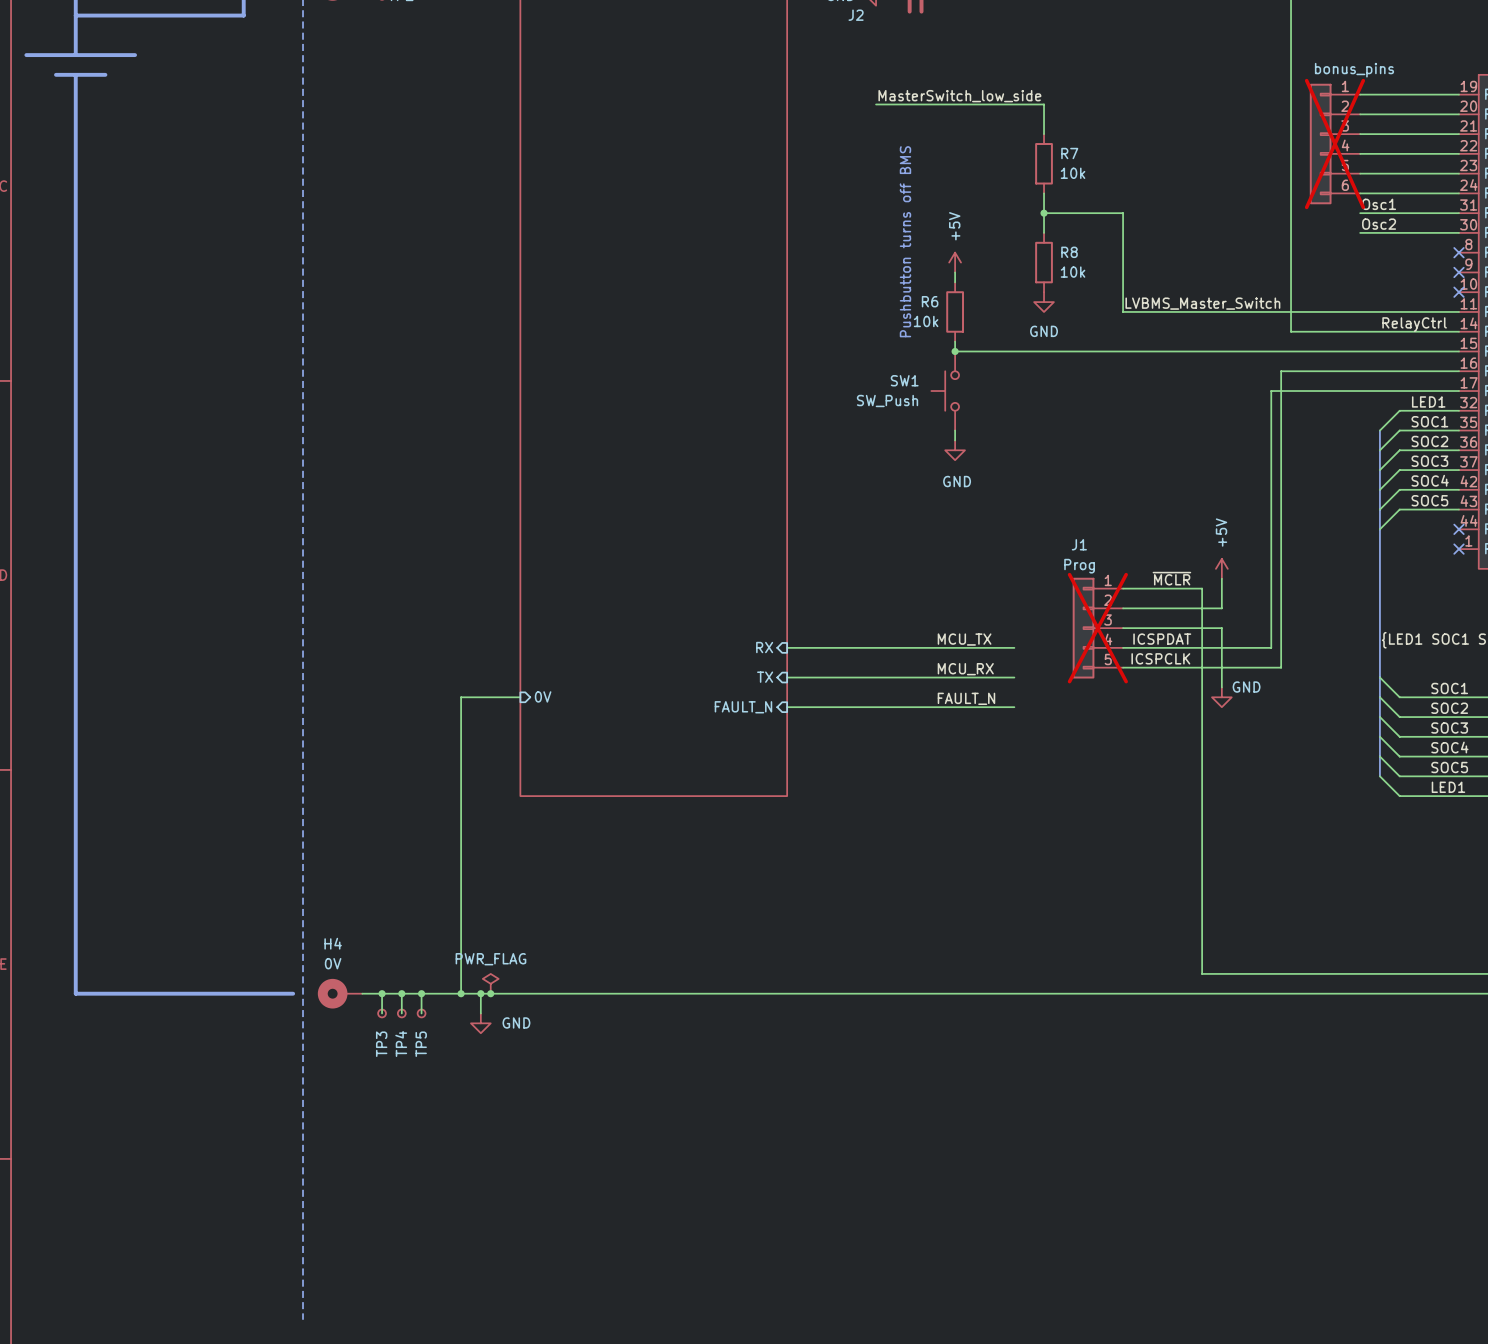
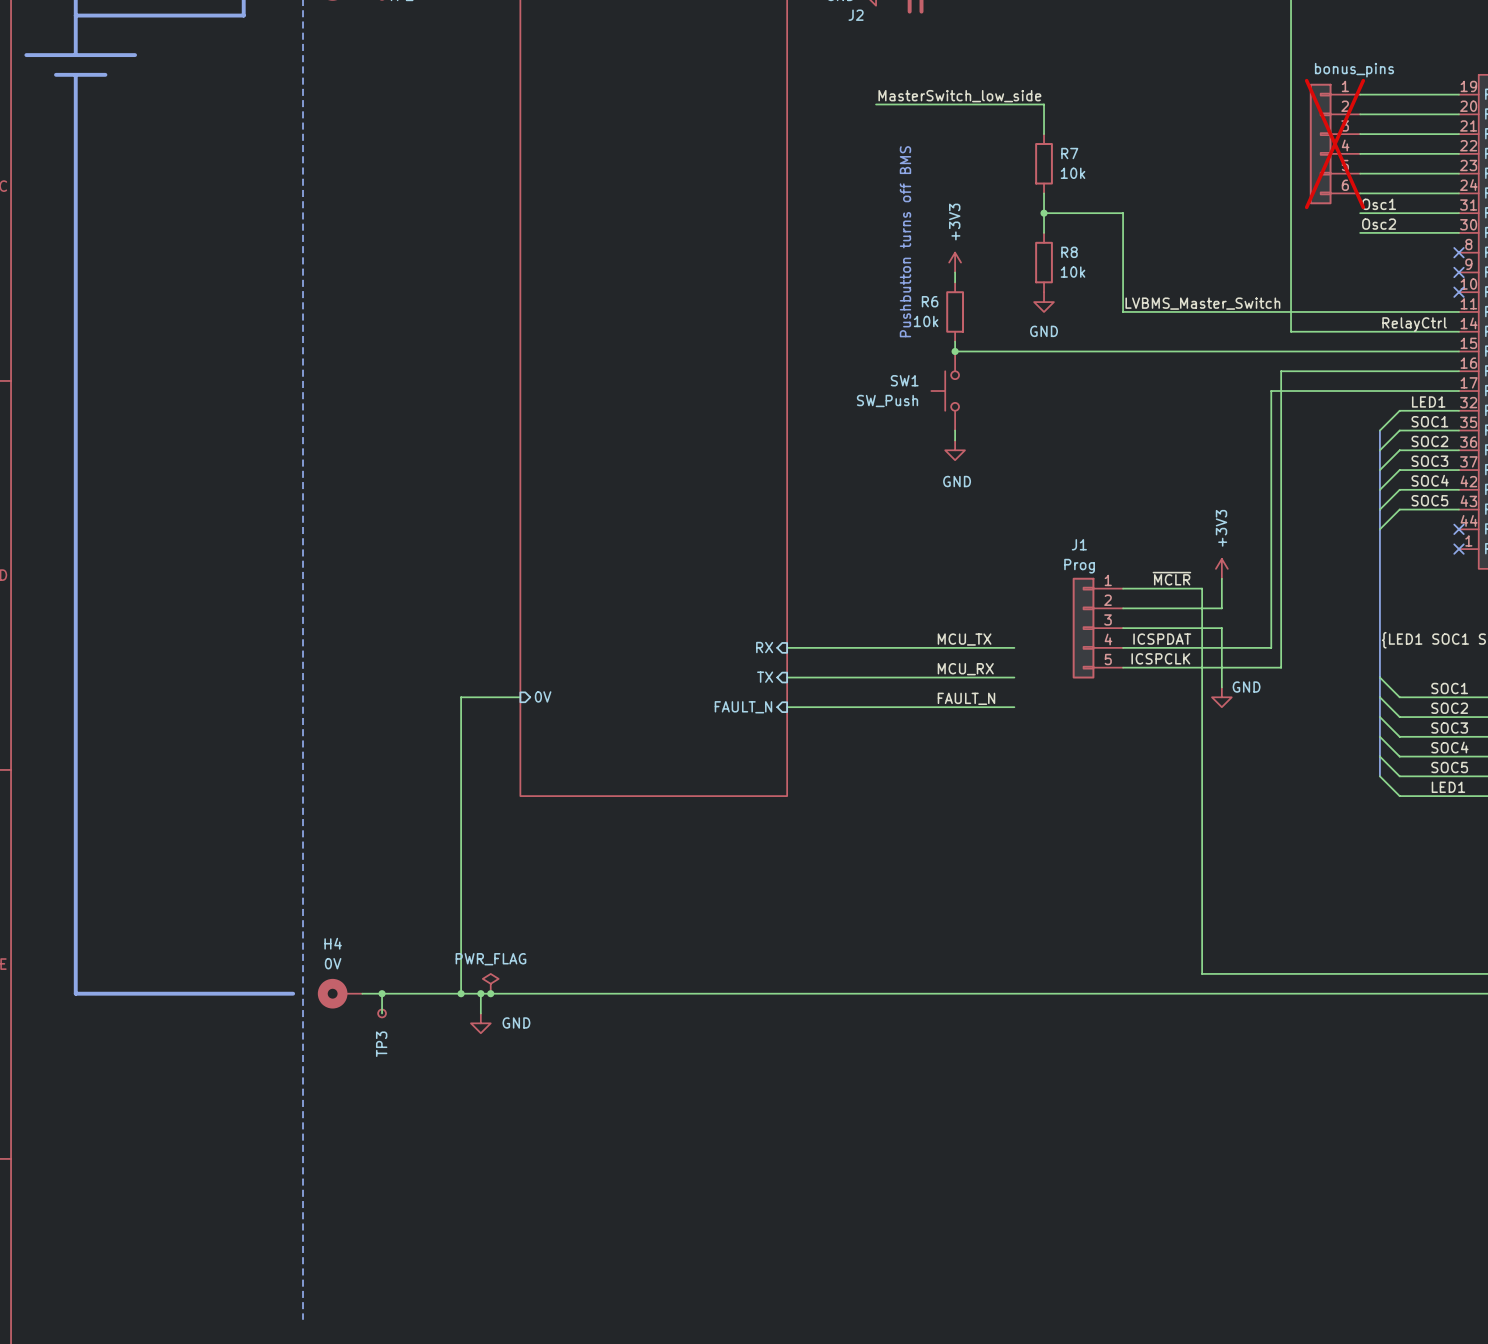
power symbol: +5V (955, 262) -> +3V3 (955, 262)
power symbol: +5V (1221, 568) -> +3V3 (1221, 568)
J1 do-not-place cross: (1097, 628) -> none
wire: (401, 993) (401, 1013) -> none
junction: (401, 993) -> none
wire: (421, 993) (421, 1013) -> none
junction: (421, 993) -> none
TP4: (401, 1013) -> none
TP5: (421, 1013) -> none

